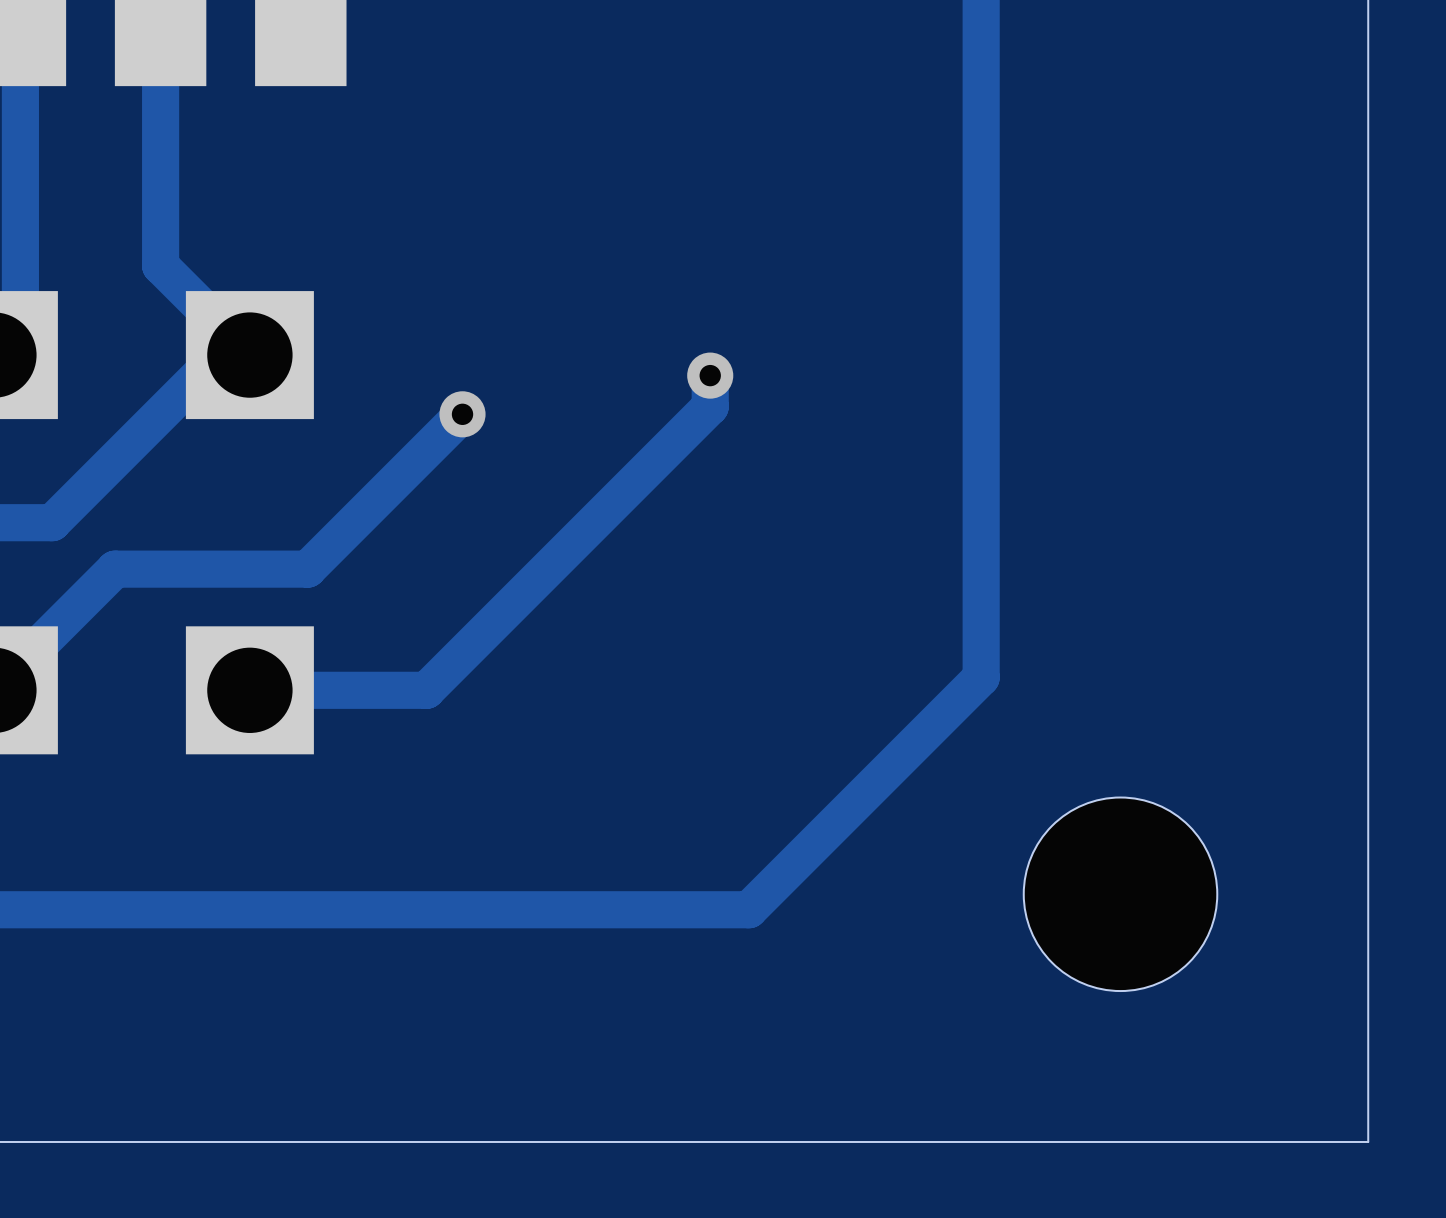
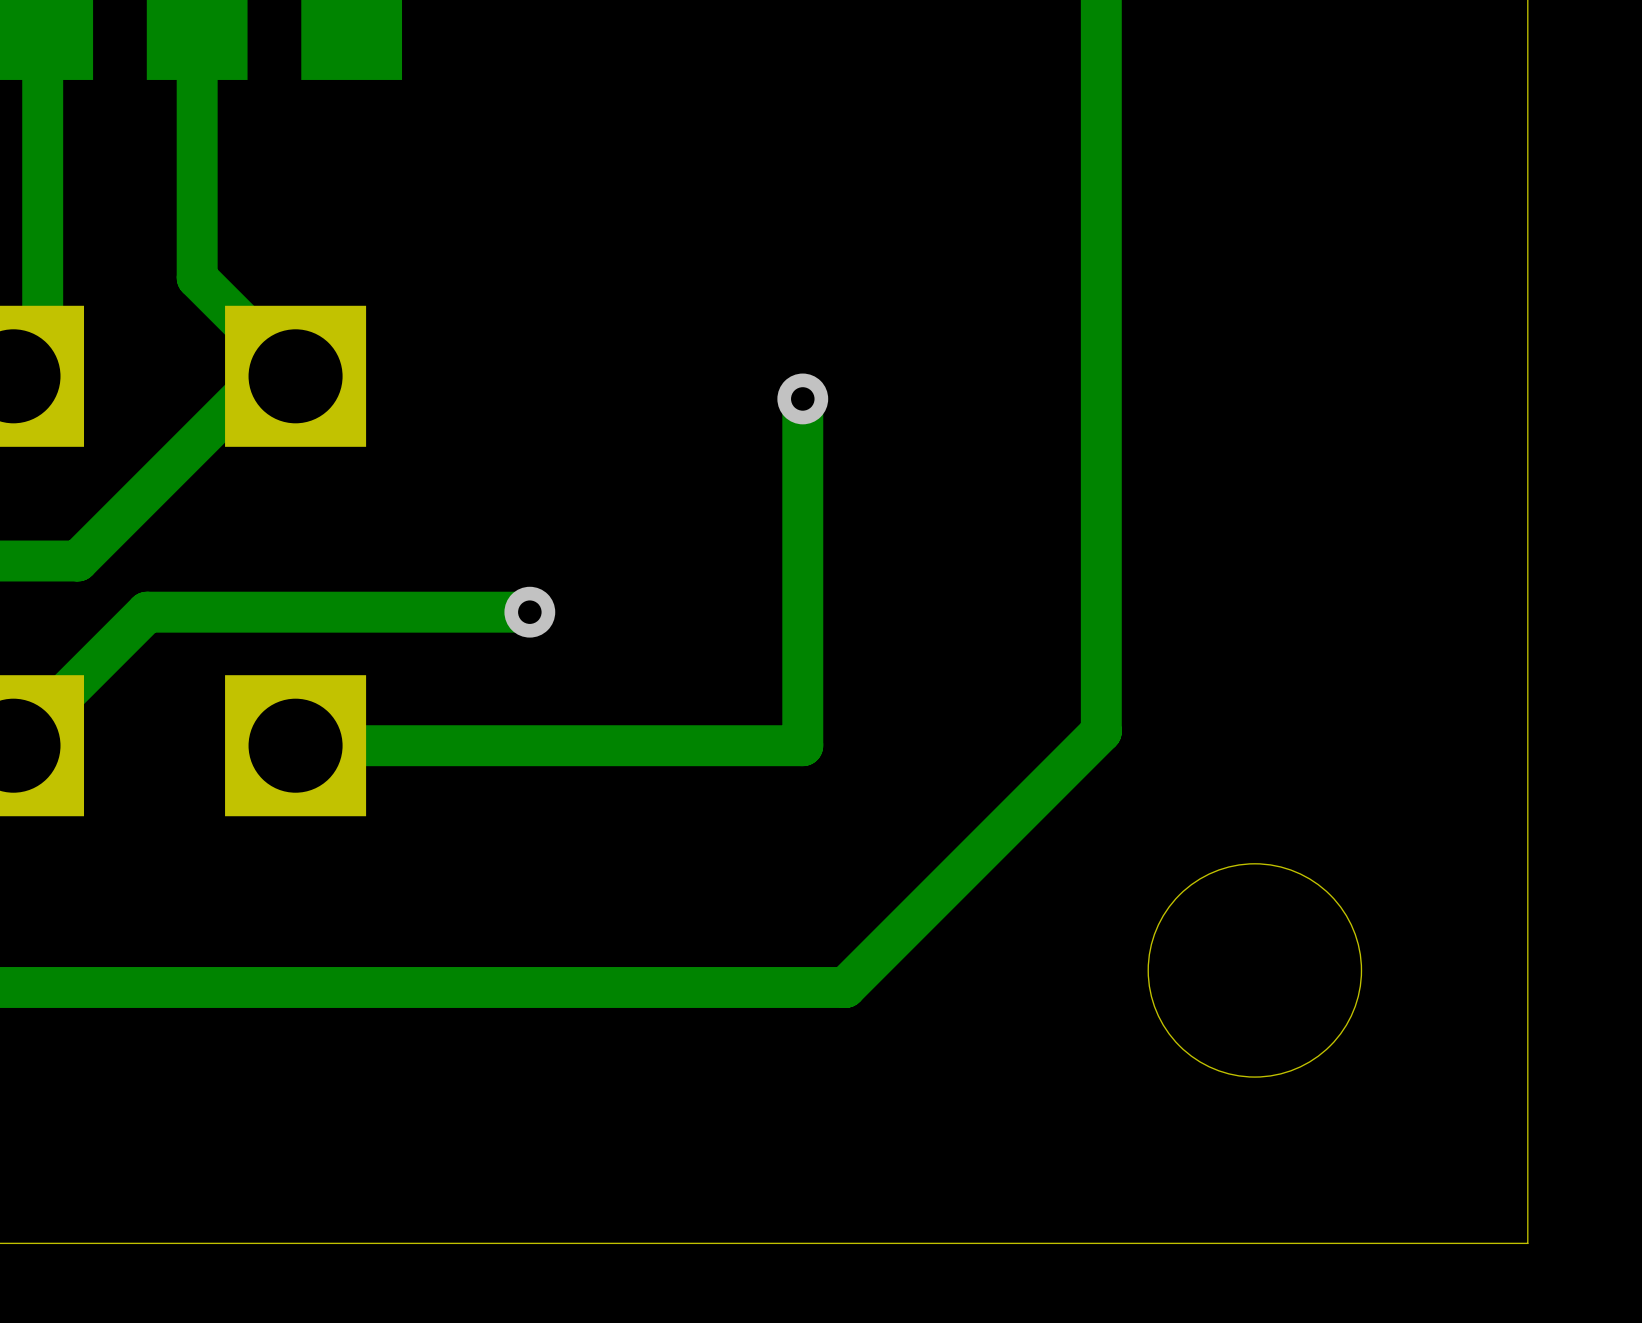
track: (710, 406) (426, 690) -> (802, 433) (802, 745) (490, 745)
track: (462, 414) (307, 569) -> (529, 612) (359, 612)
via position: (462, 414) -> (529, 612)

